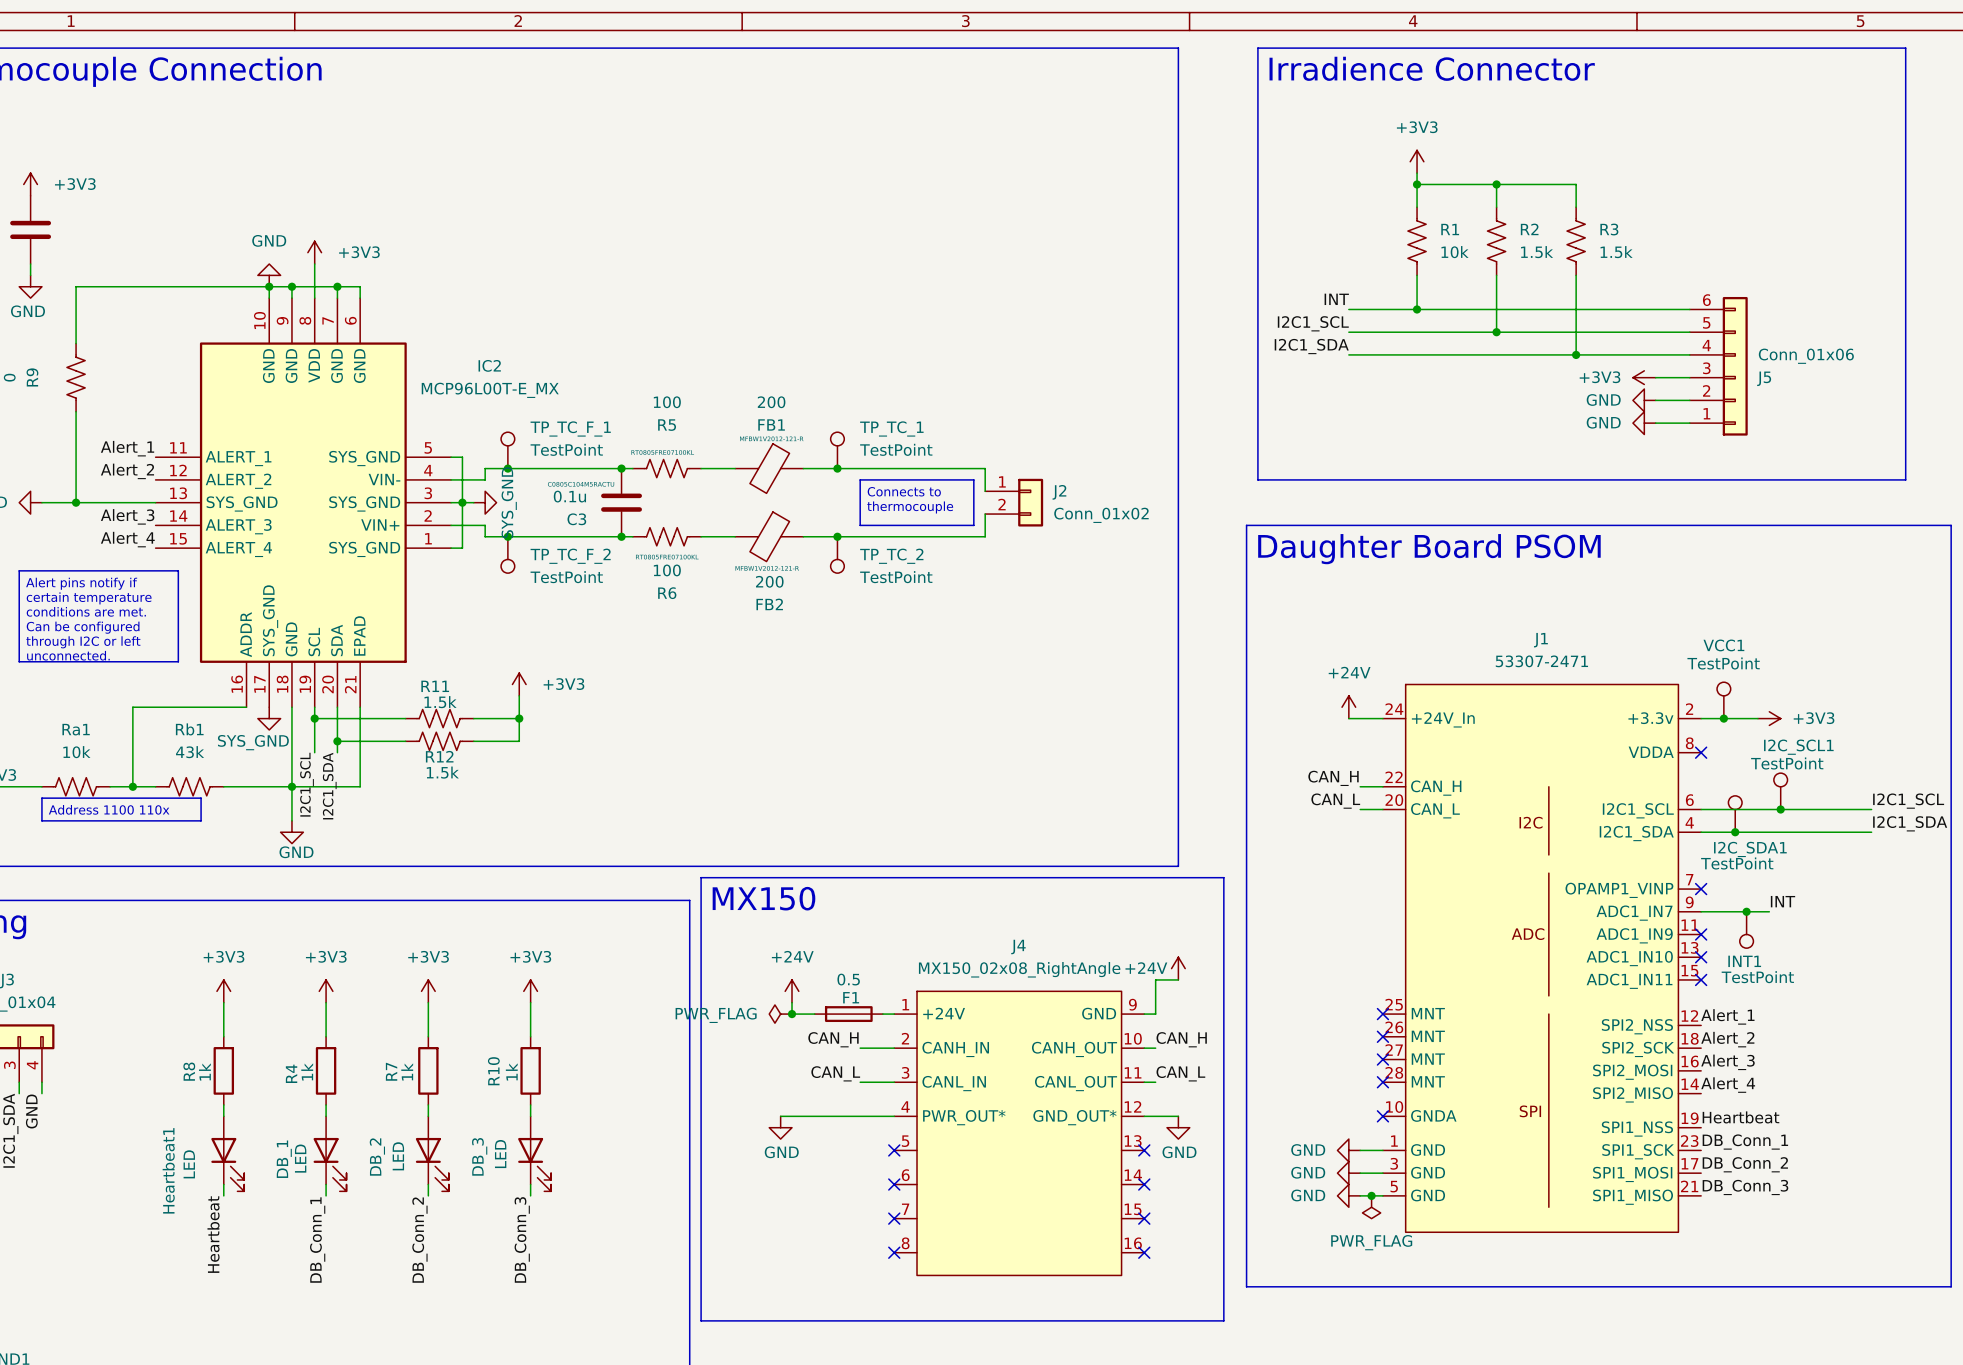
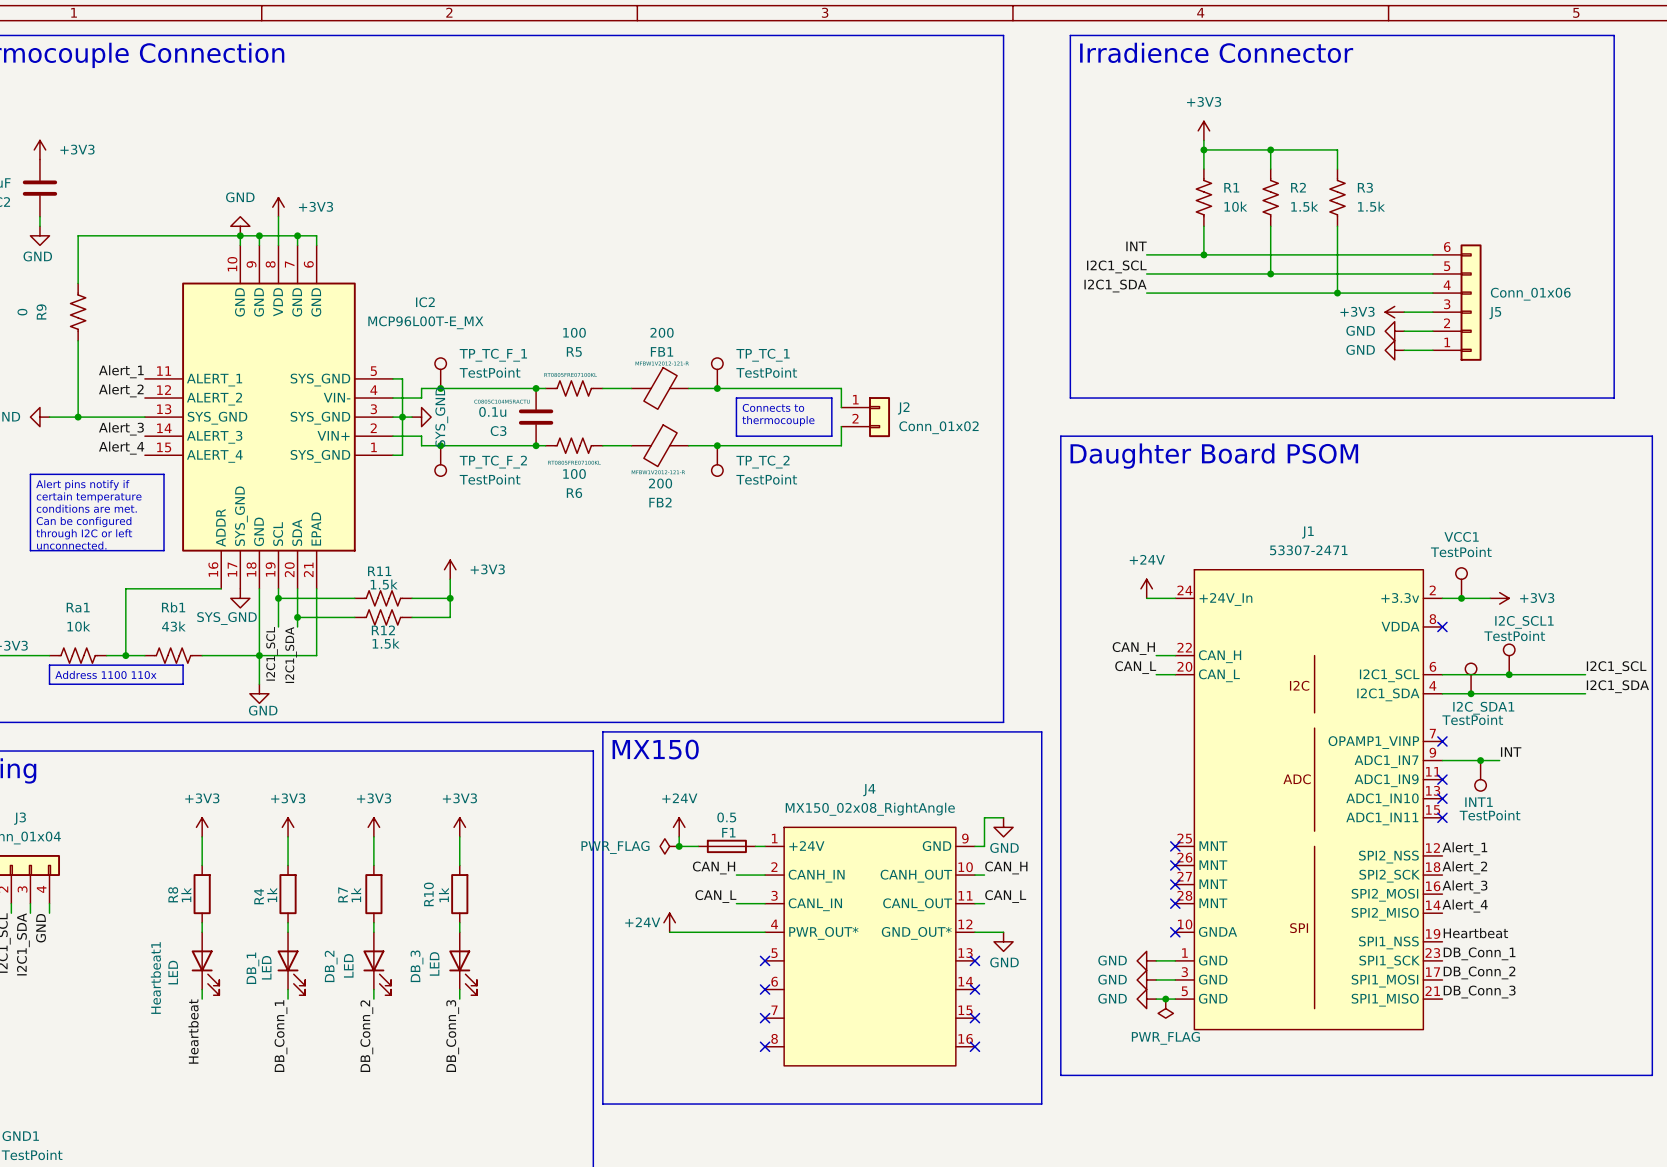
power symbol: +24V (1178, 968) -> none
power symbol: none -> GND (1003, 827)
power symbol: none -> +24V (669, 922)
power symbol: GND (780, 1127) -> none

